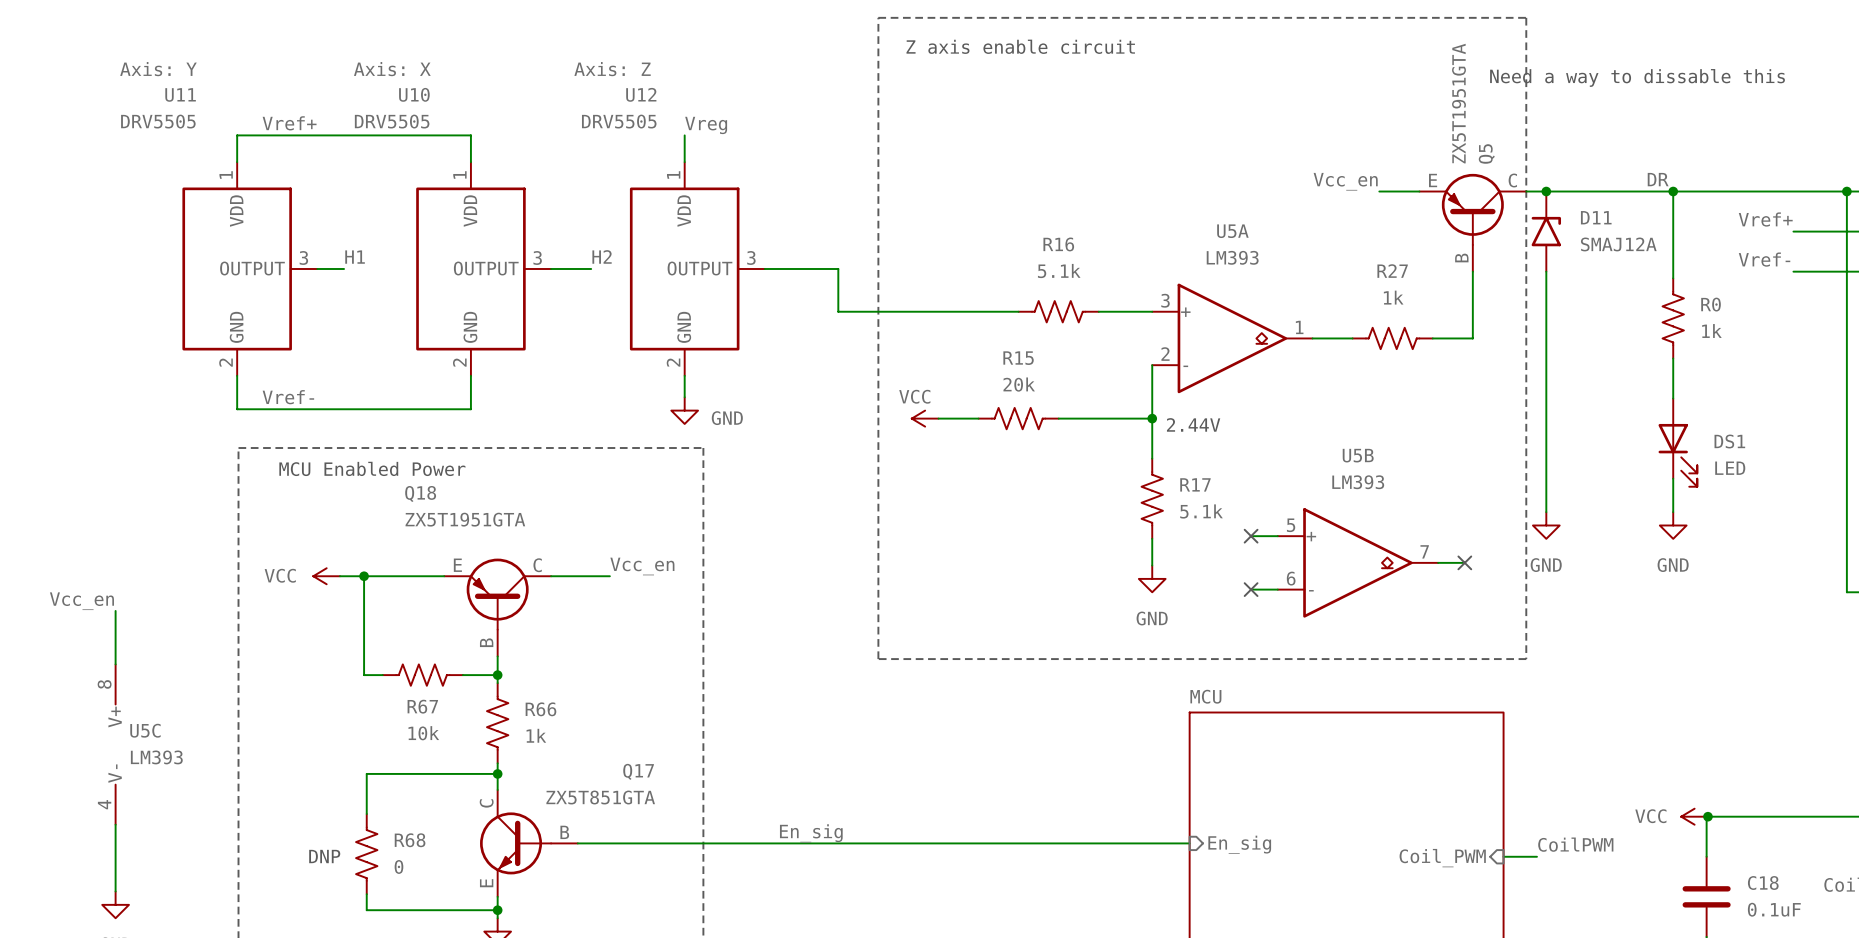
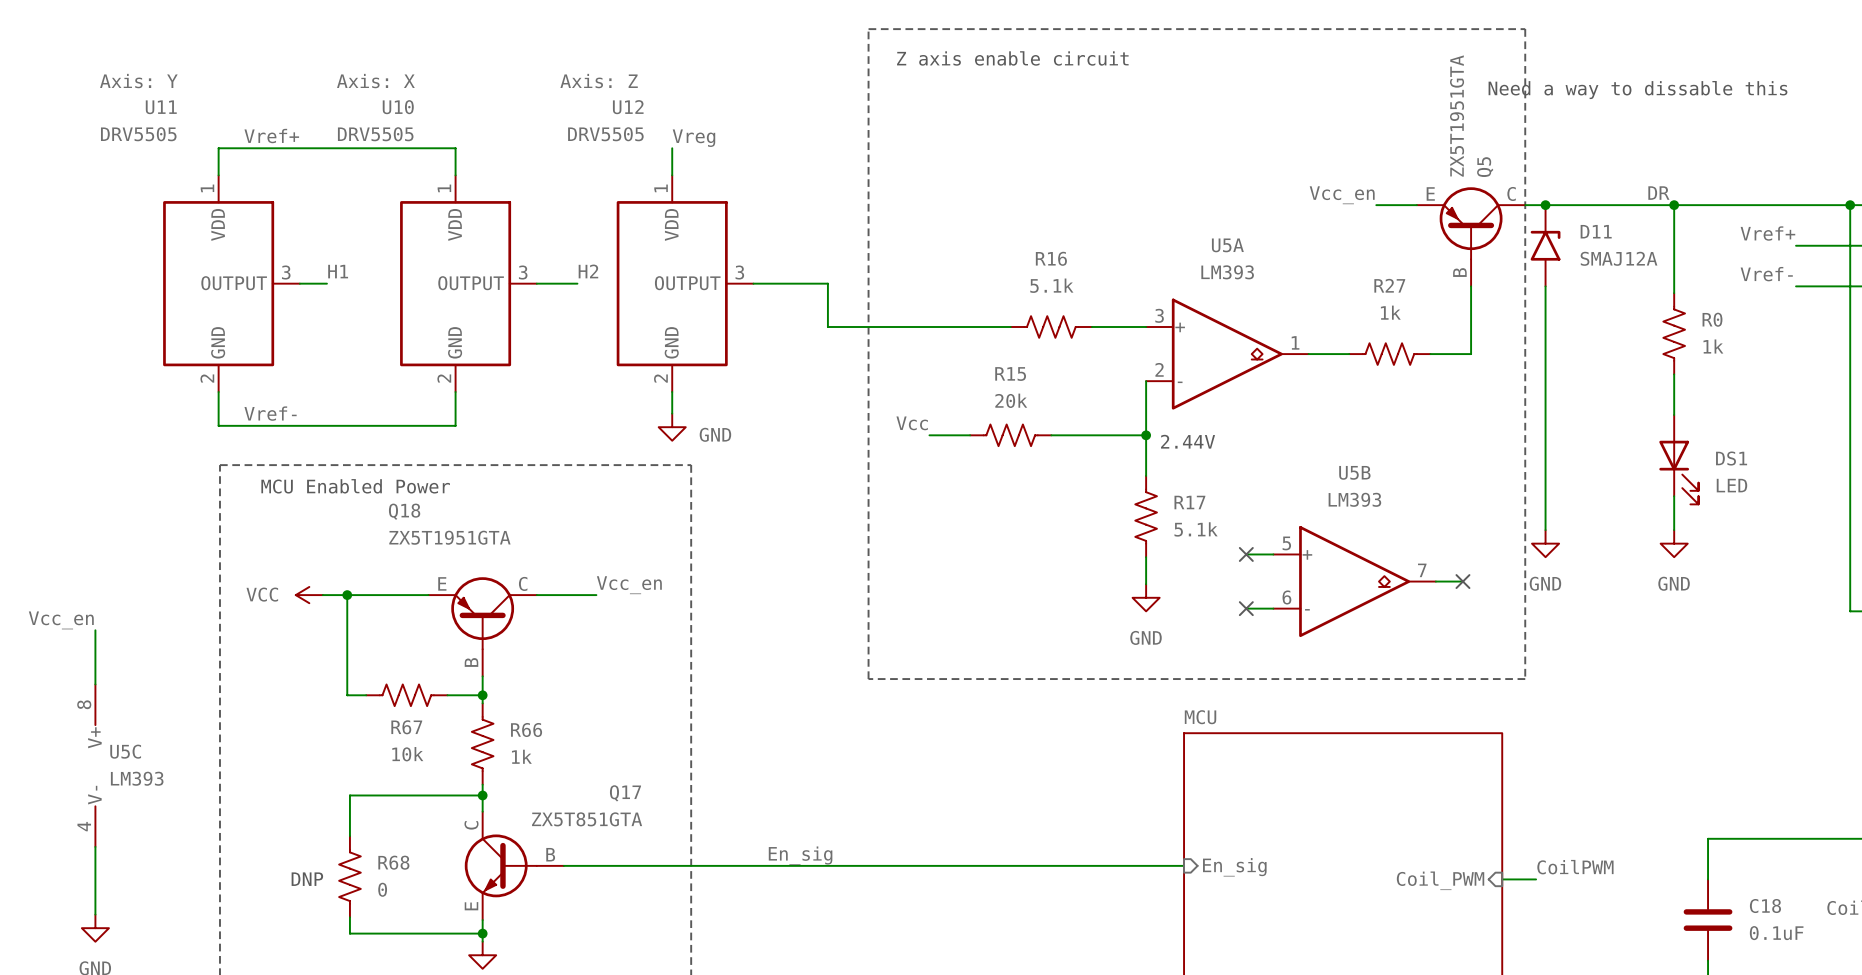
label: none -> Vcc (912, 423)
power symbol: VCC (925, 418) -> none
power symbol: VCC (1694, 816) -> none
junction: (1707, 816) -> none

